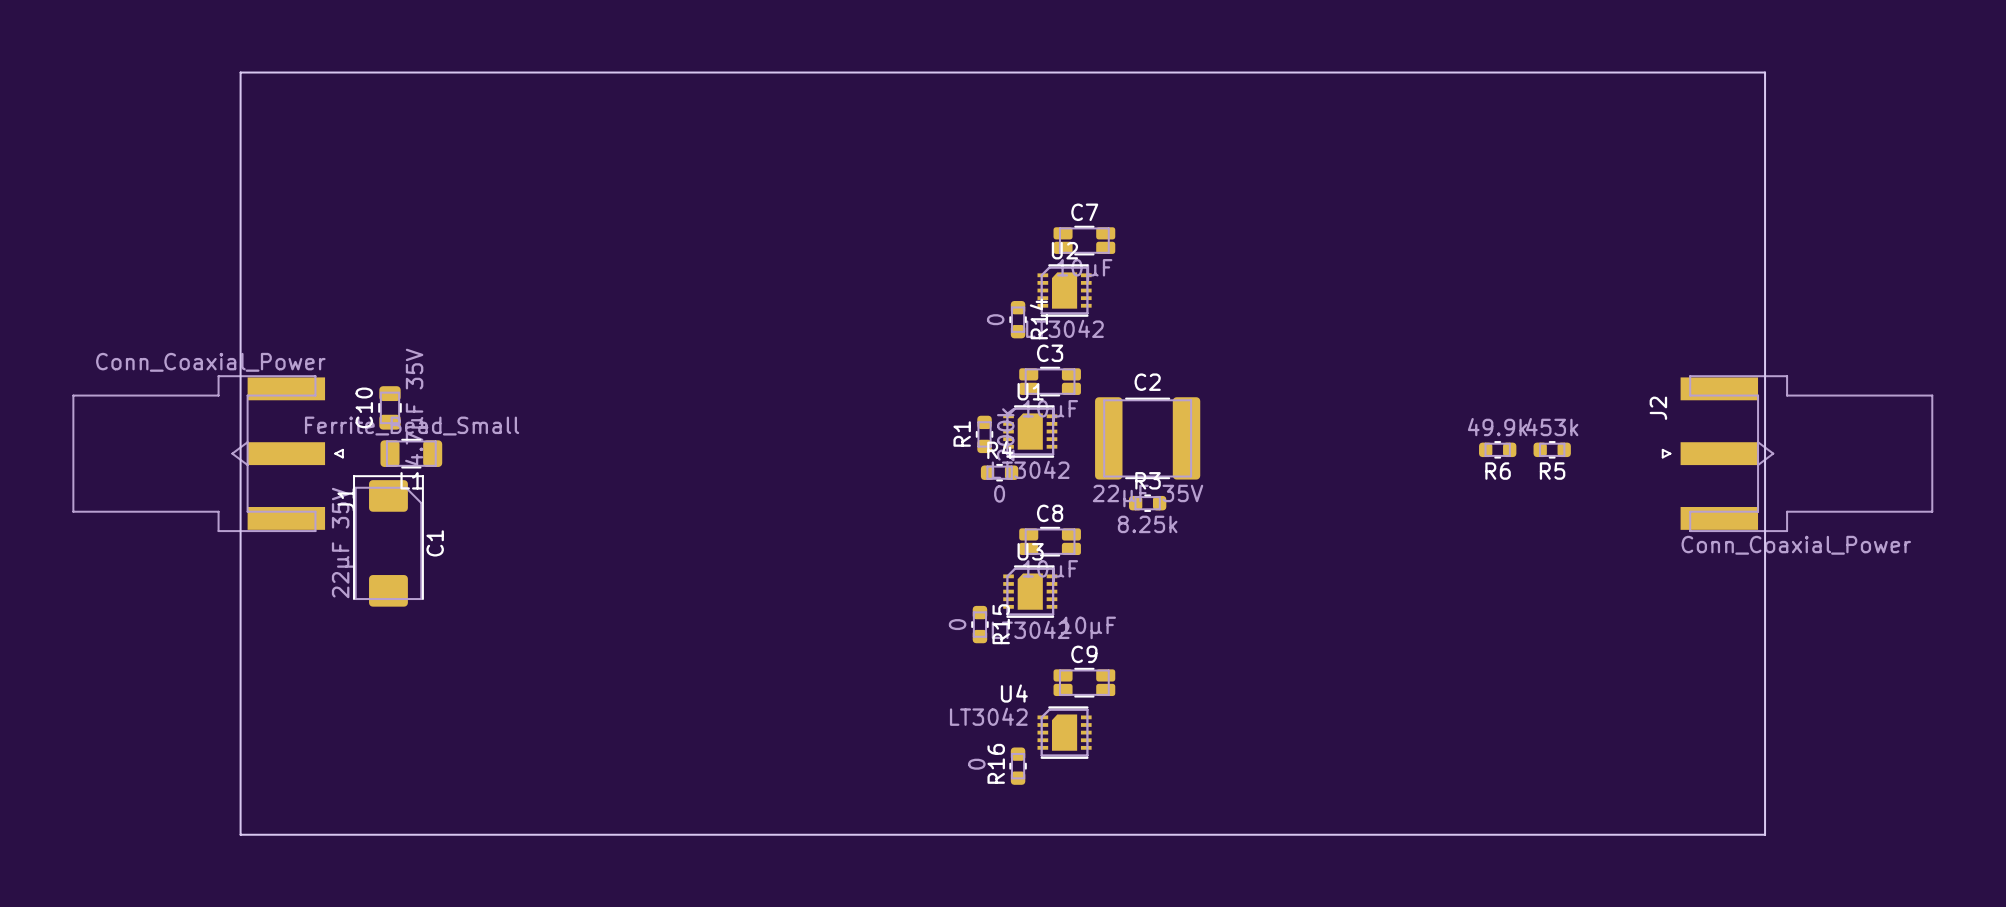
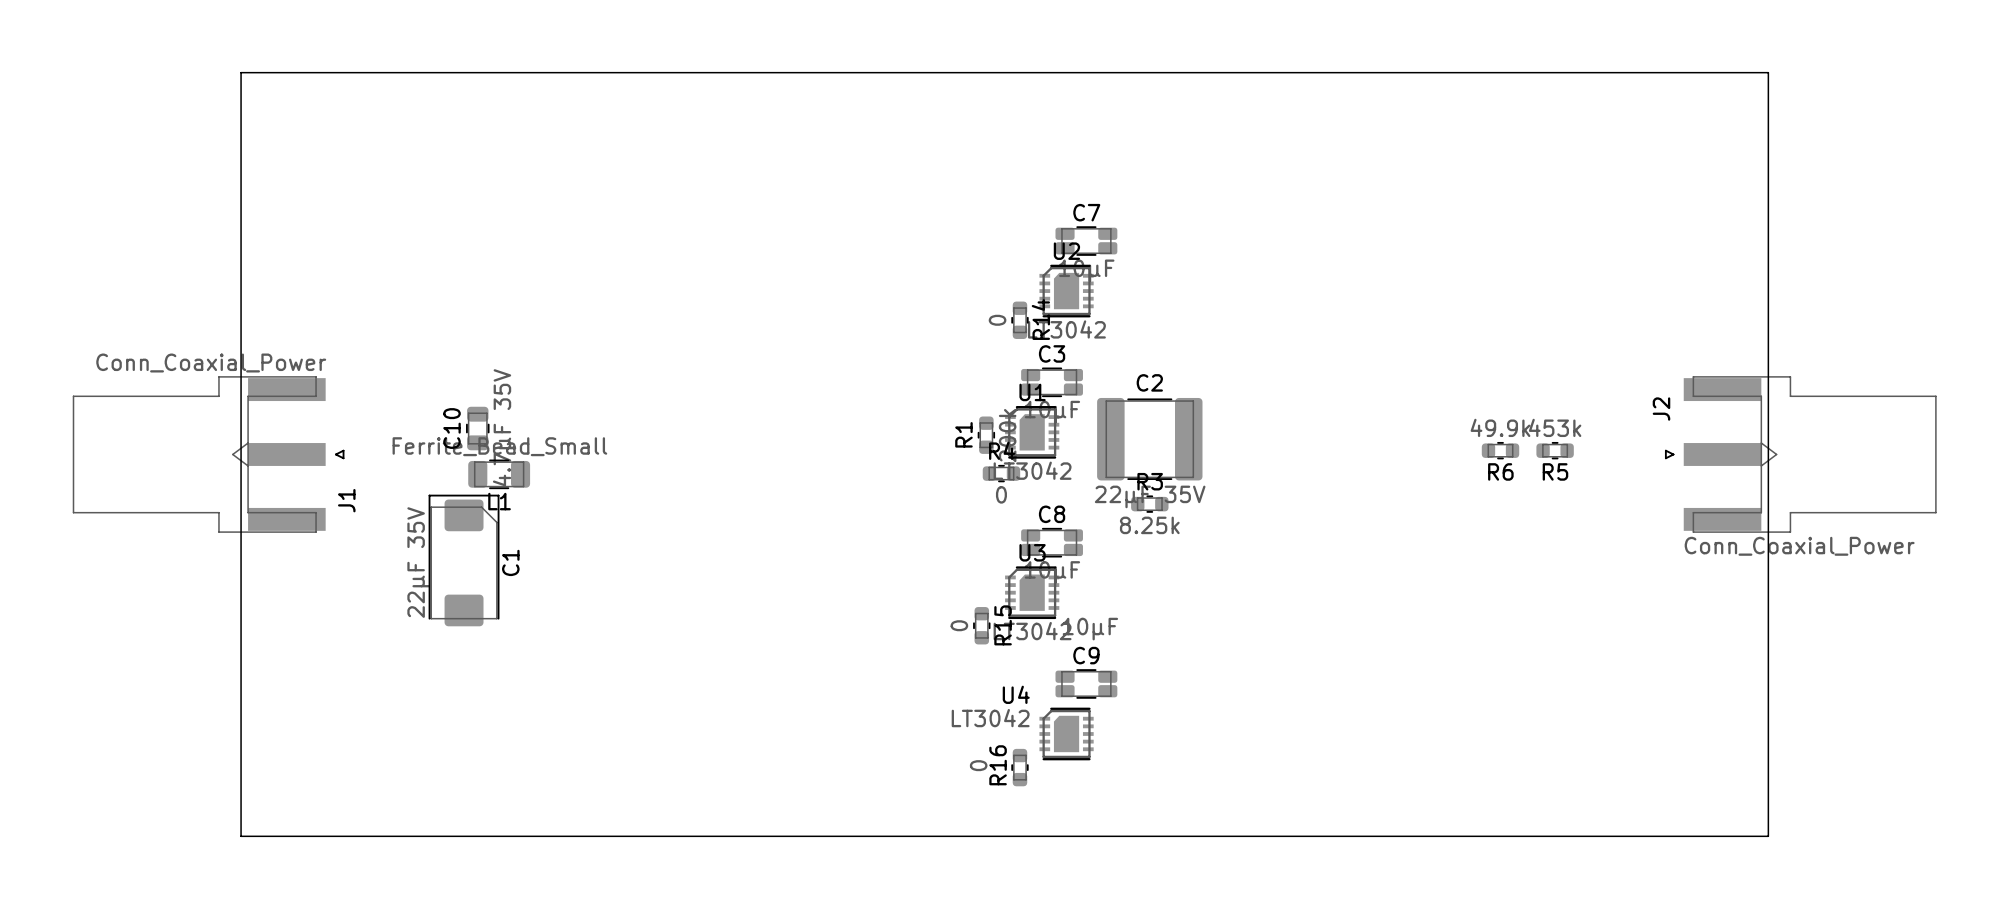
C10 position: (389, 407) -> (477, 428)
L1 position: (411, 453) -> (499, 474)
C1 position: (388, 540) -> (464, 560)

